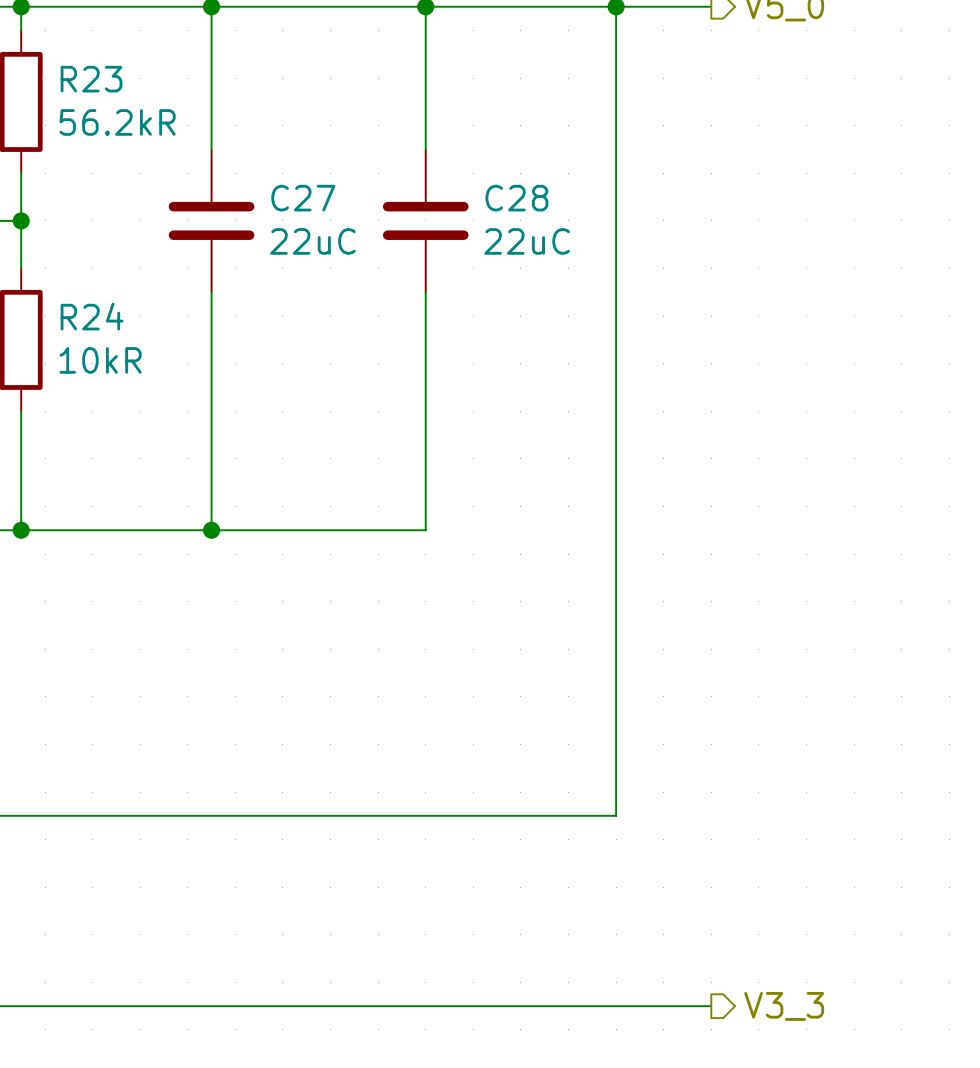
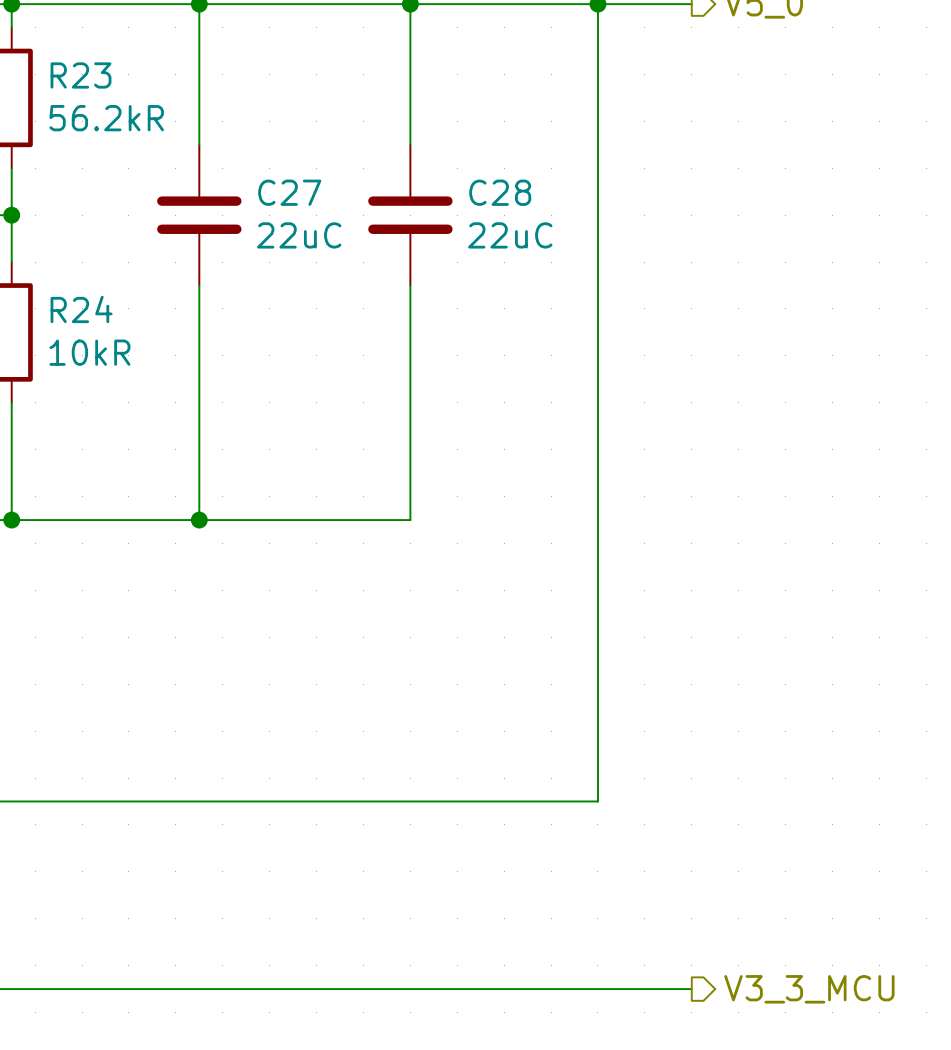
hierarchical label: V3_3 (784, 1006) -> V3_3_MCU (809, 989)

